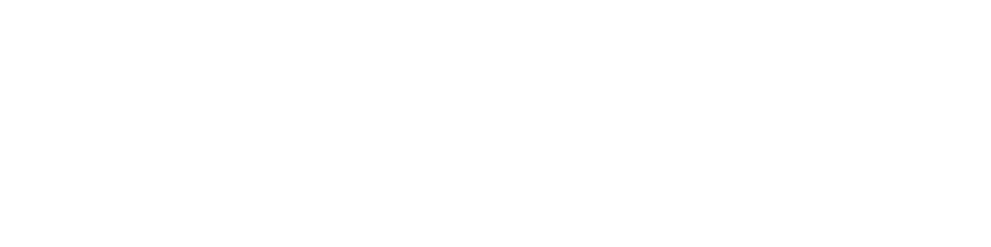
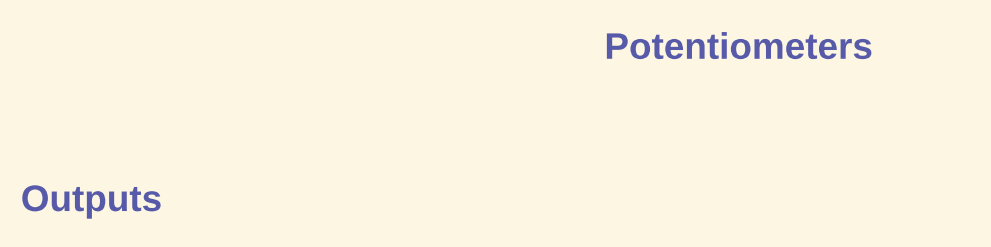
text: none -> Potentiometers (739, 45)
text: none -> Outputs (91, 201)

